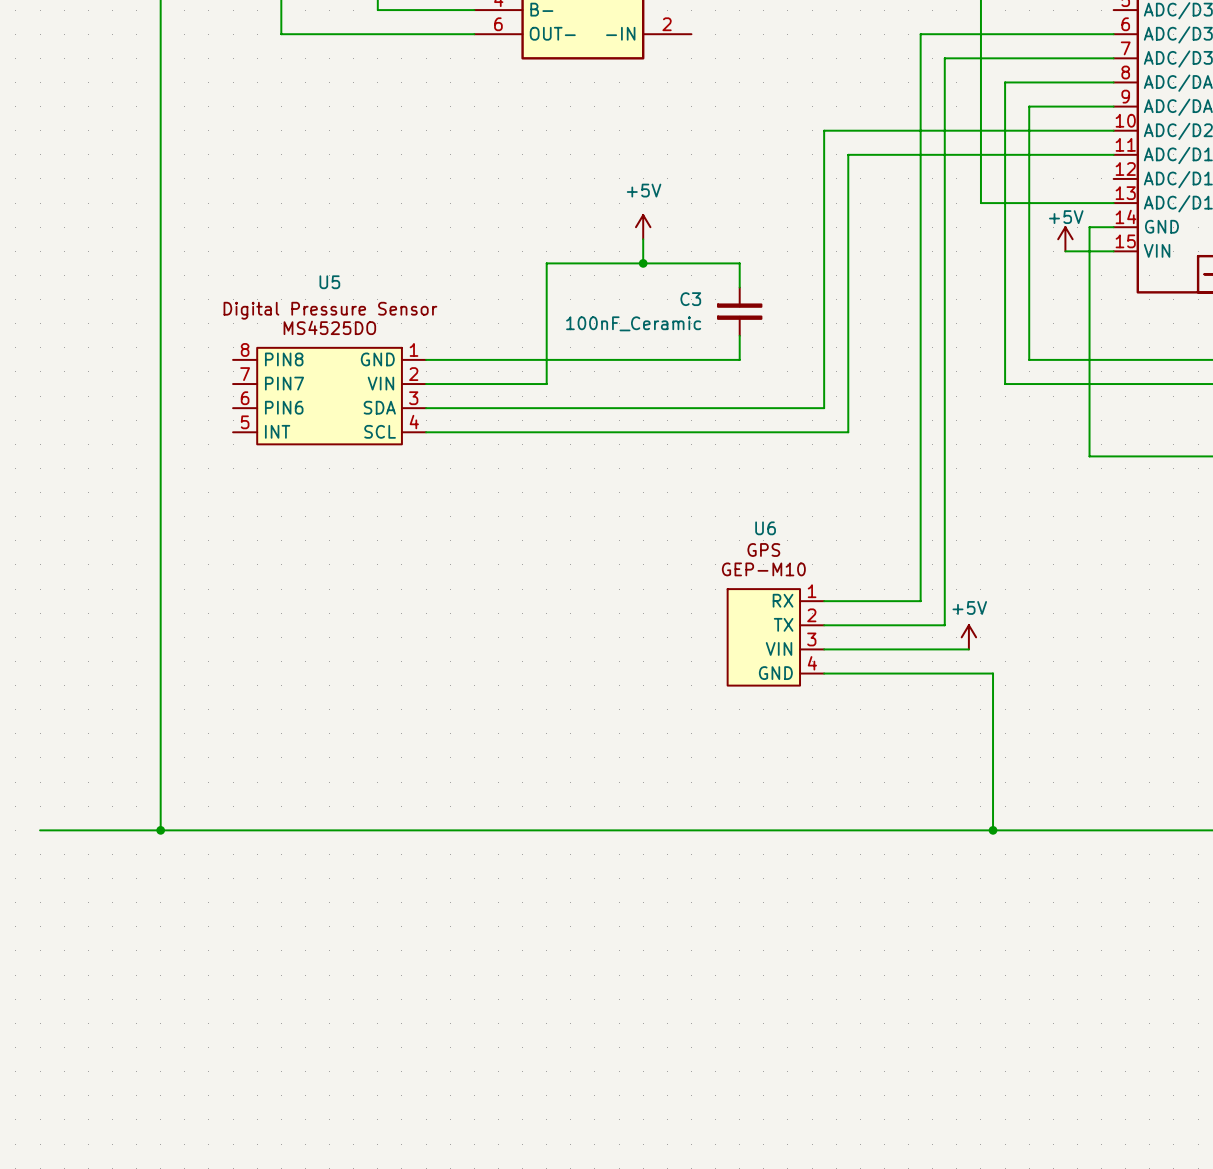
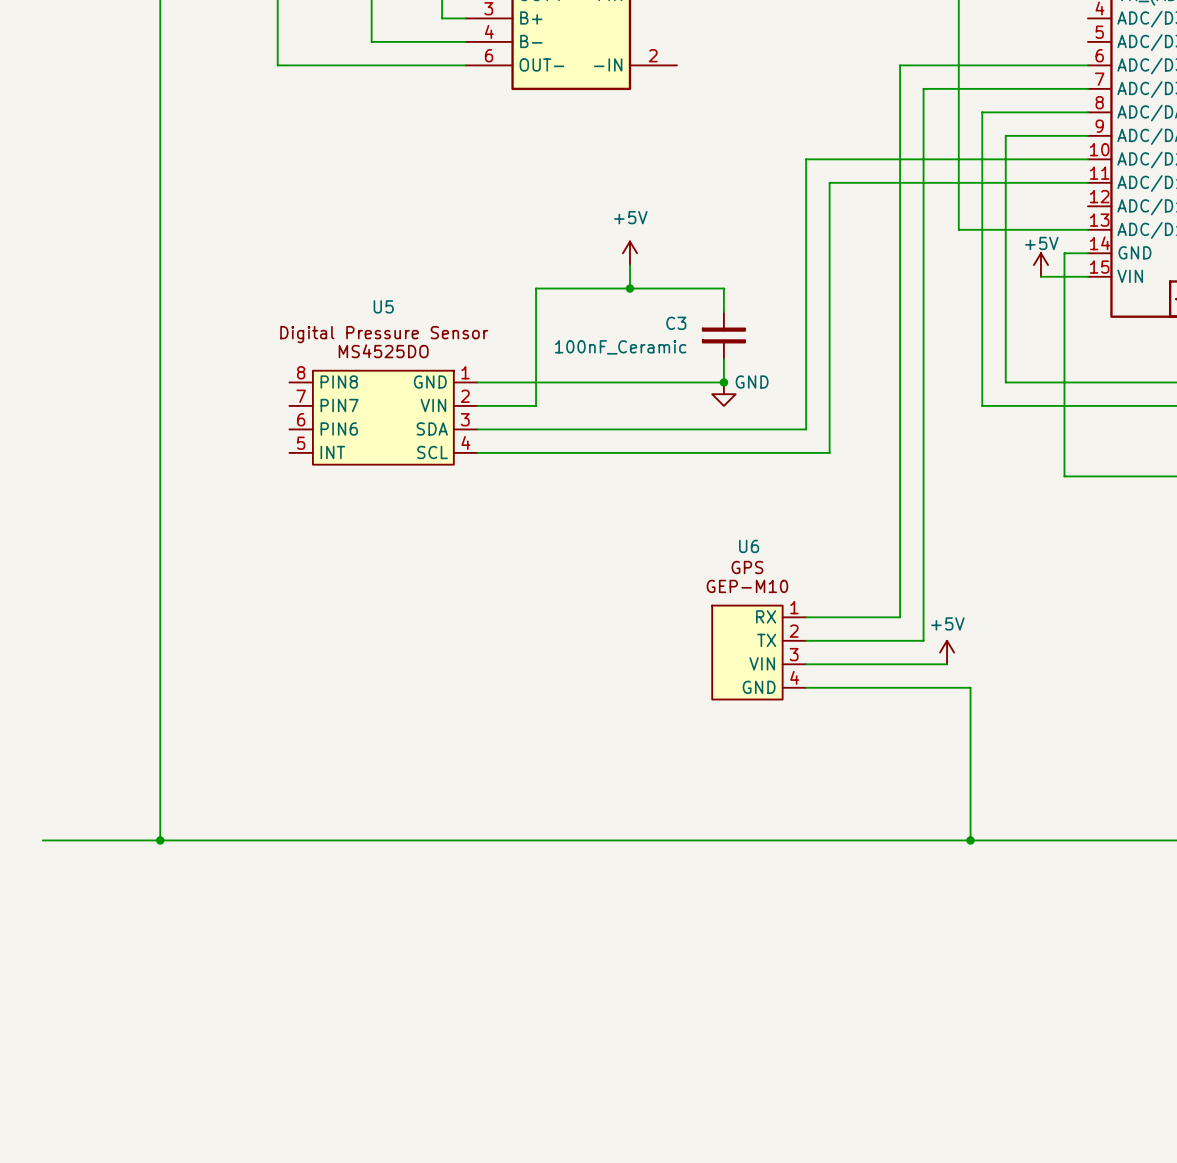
junction: none -> (723, 382)
power symbol: none -> GND (723, 394)
U5 position: (329, 396) -> (383, 417)

